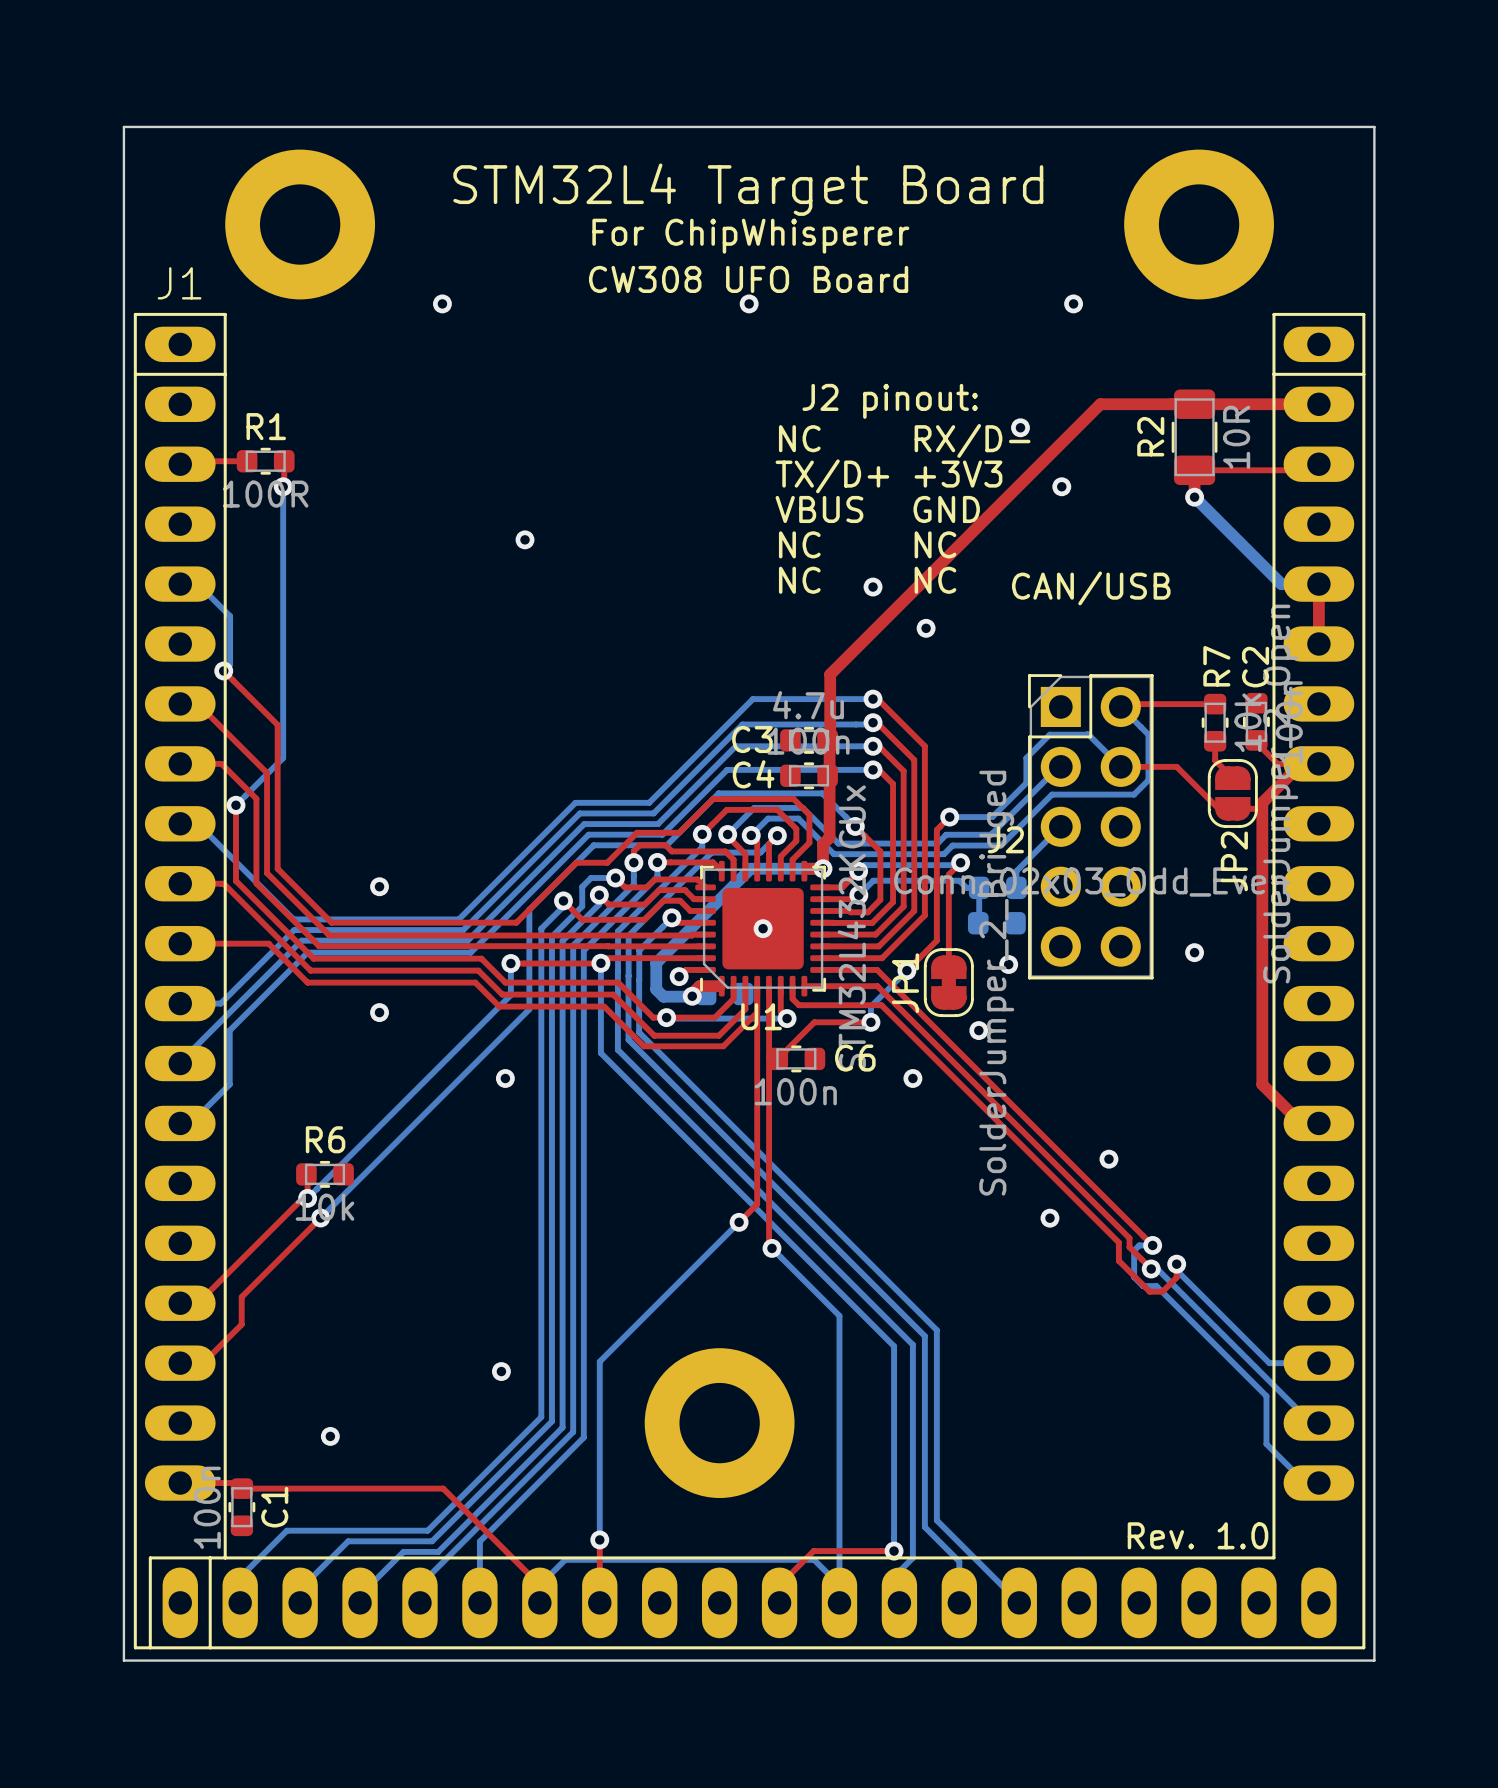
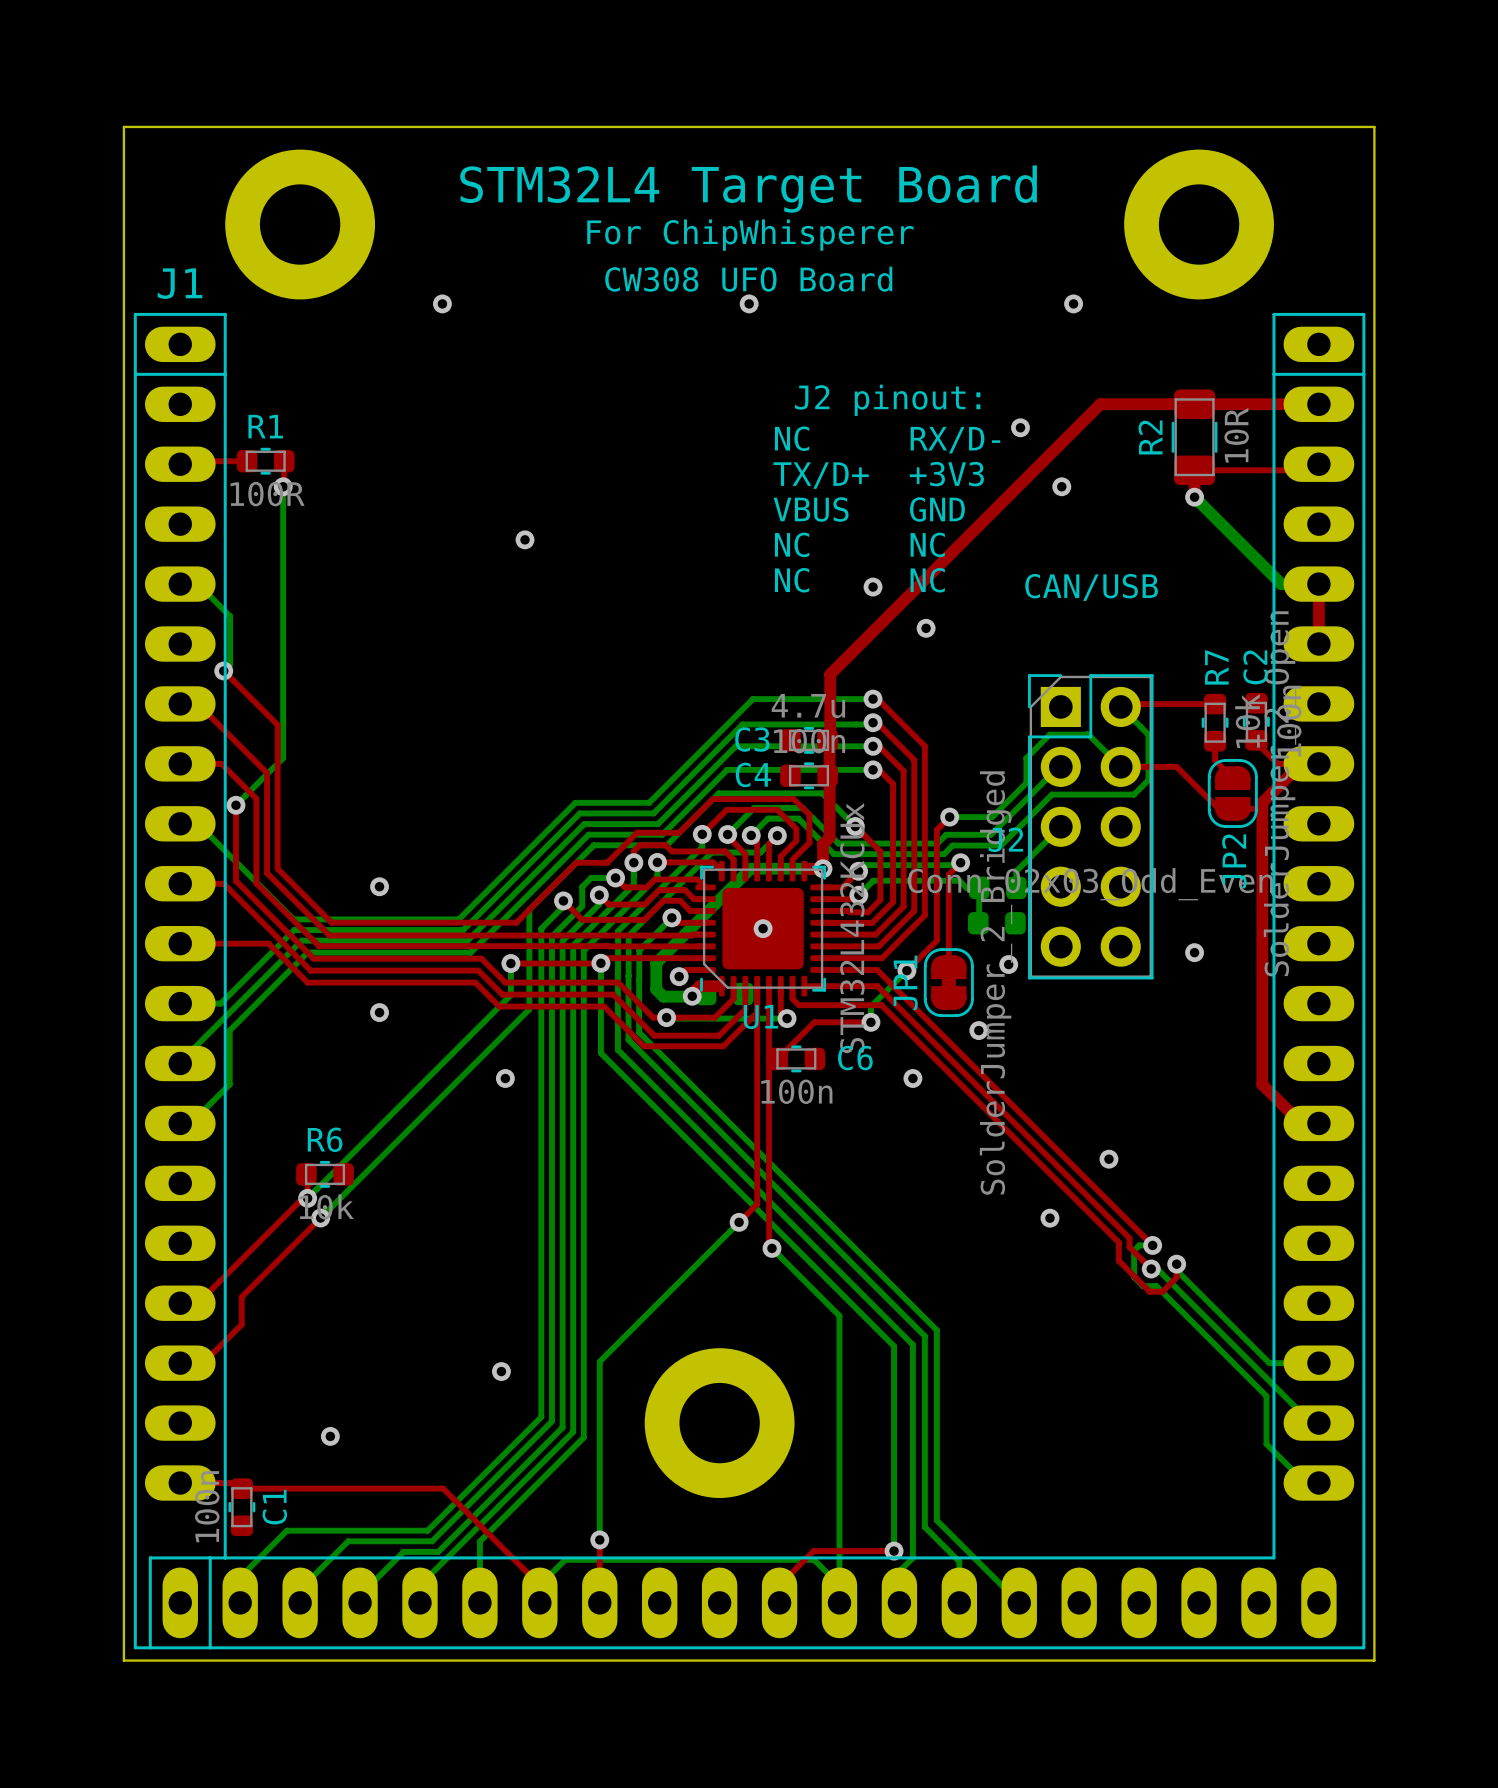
text: Rev. 1.0 (1198, 1535) -> none

